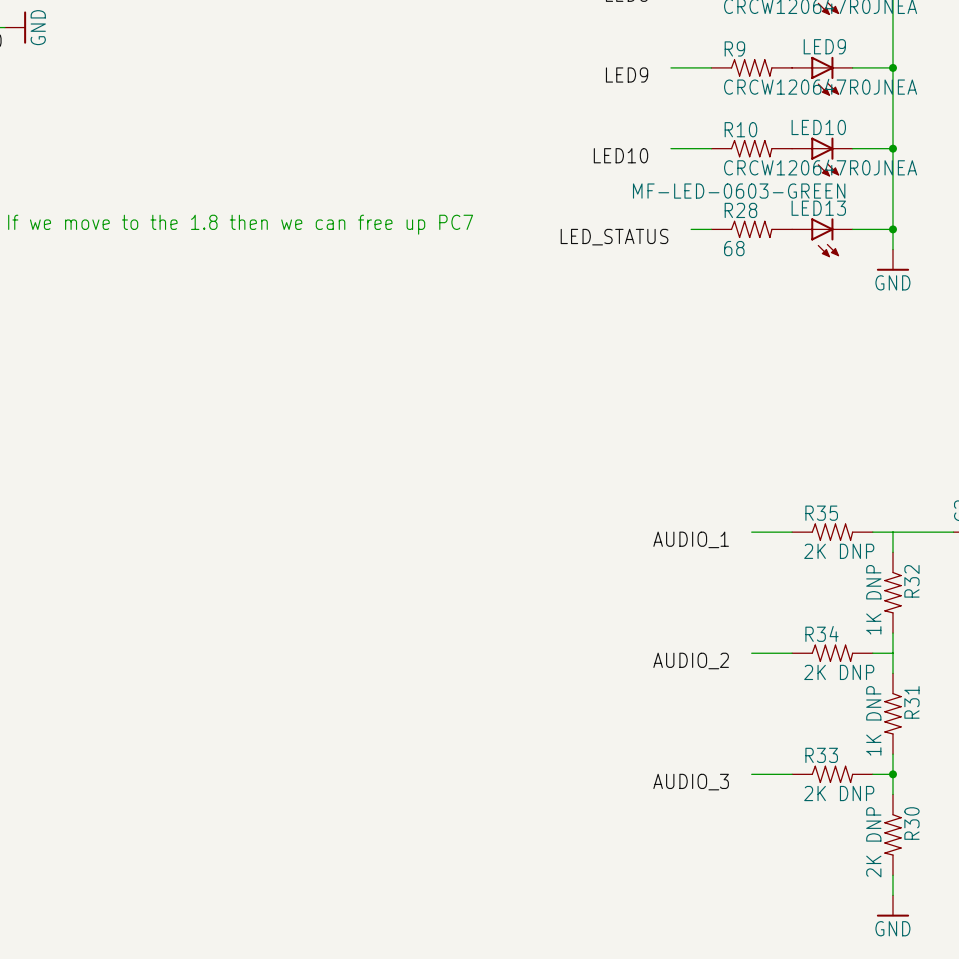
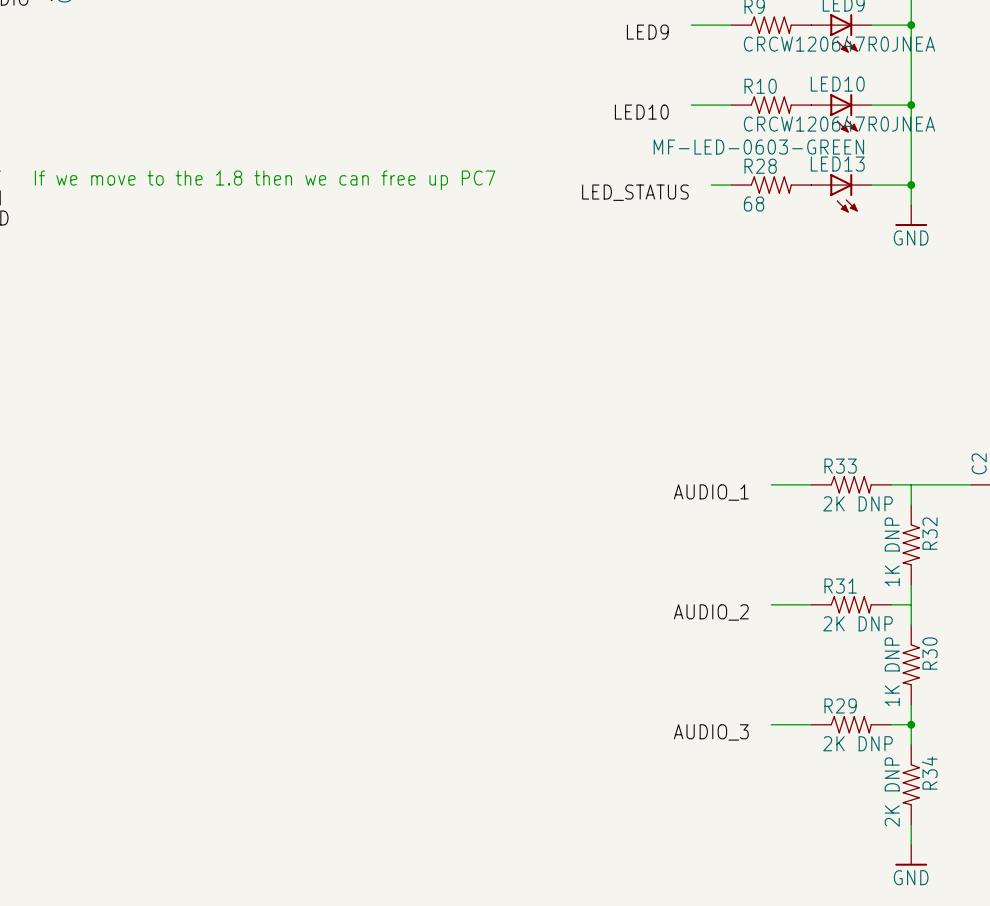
R35 name: R35 (821, 513) -> R33 (840, 466)
R34 name: R34 (821, 633) -> R31 (840, 586)
R31 name: R31 (911, 702) -> R30 (930, 653)
R33 name: R33 (821, 755) -> R29 (840, 705)
R30 name: R30 (911, 823) -> R34 (929, 773)

